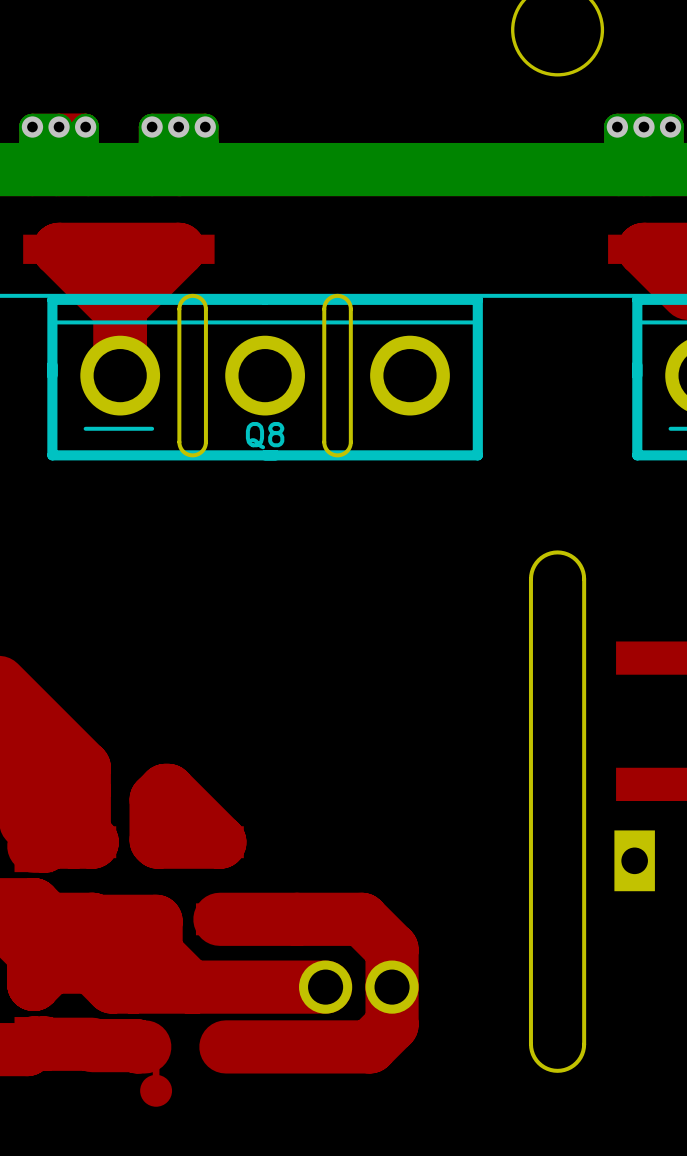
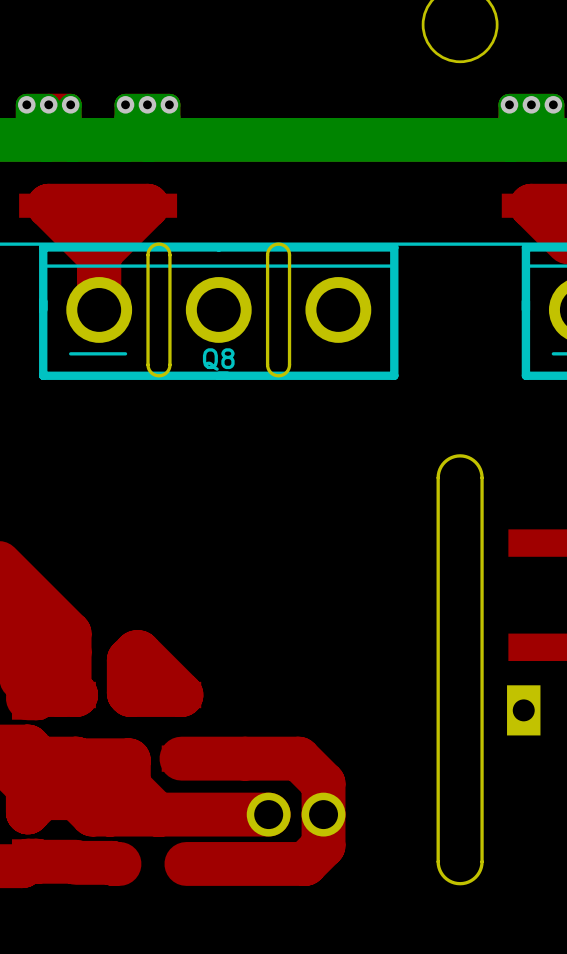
top track: (156, 1046) (156, 1090) -> none
part: (156, 1090) -> none

